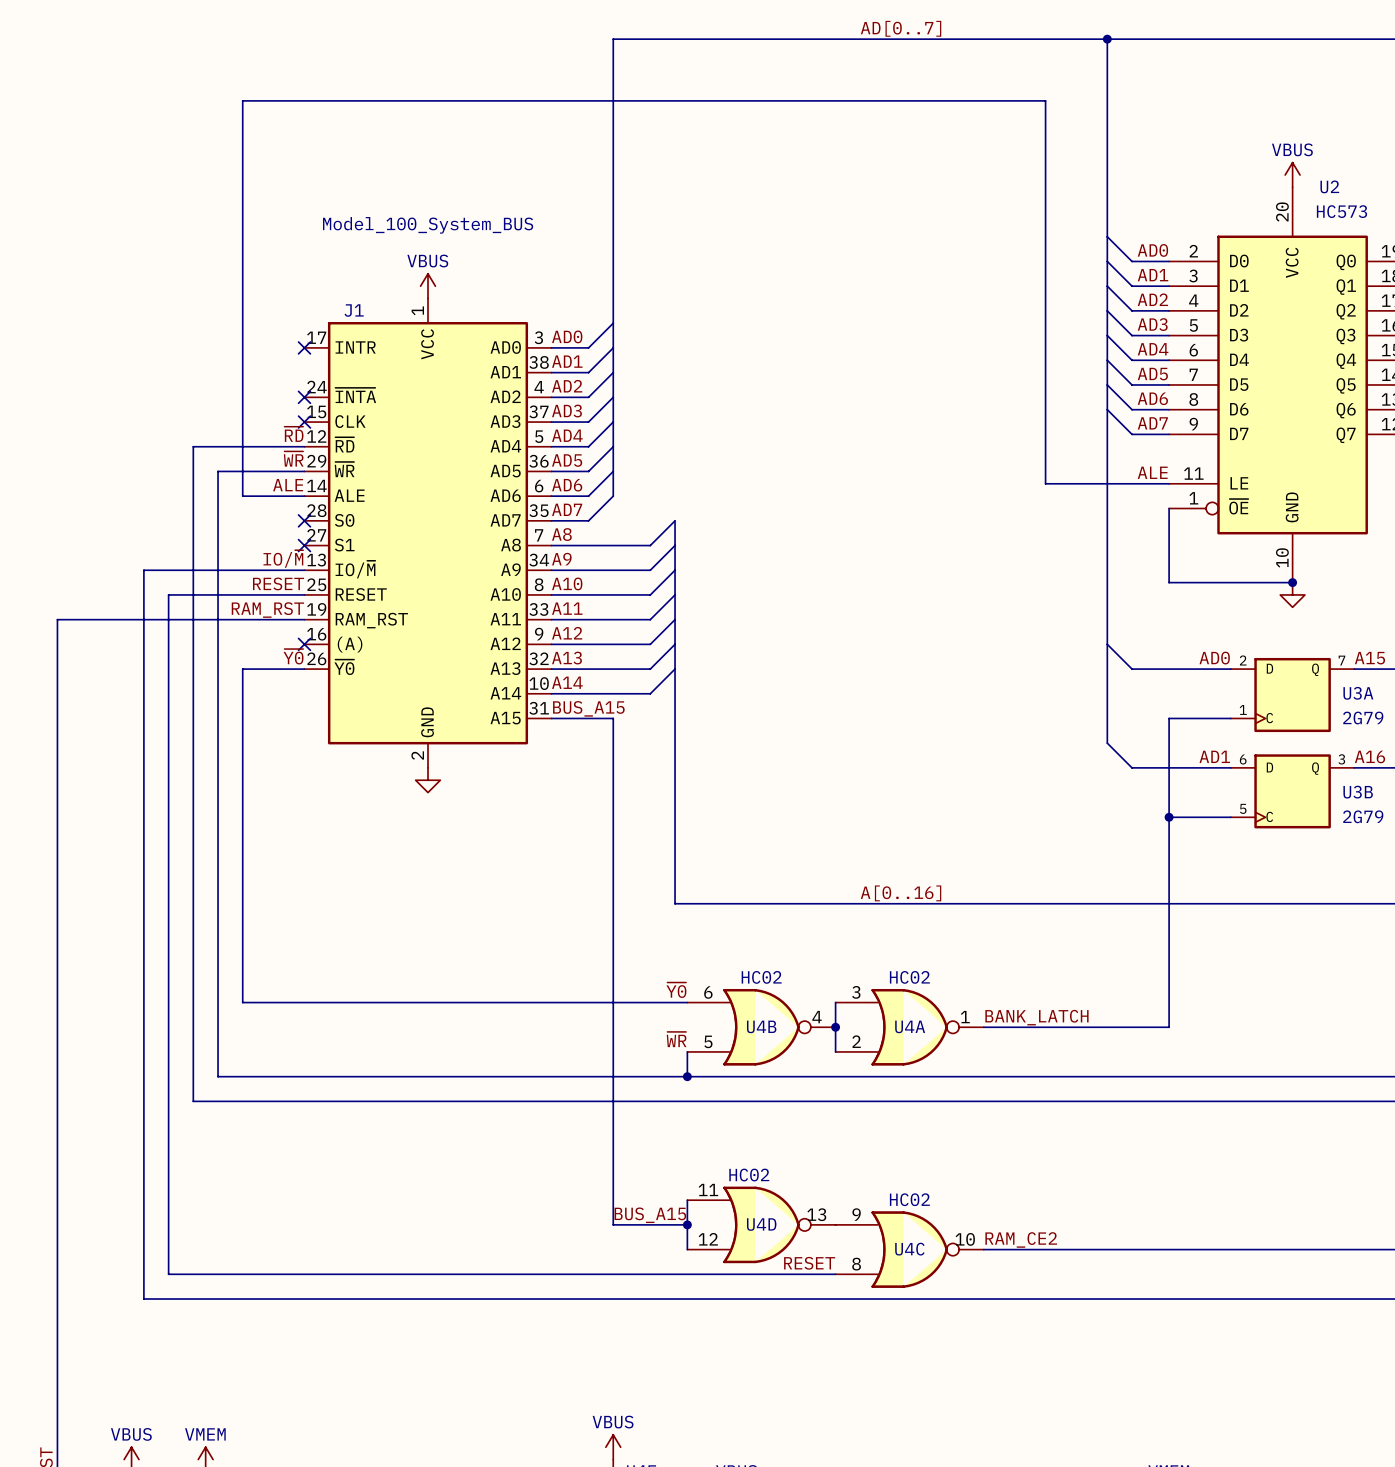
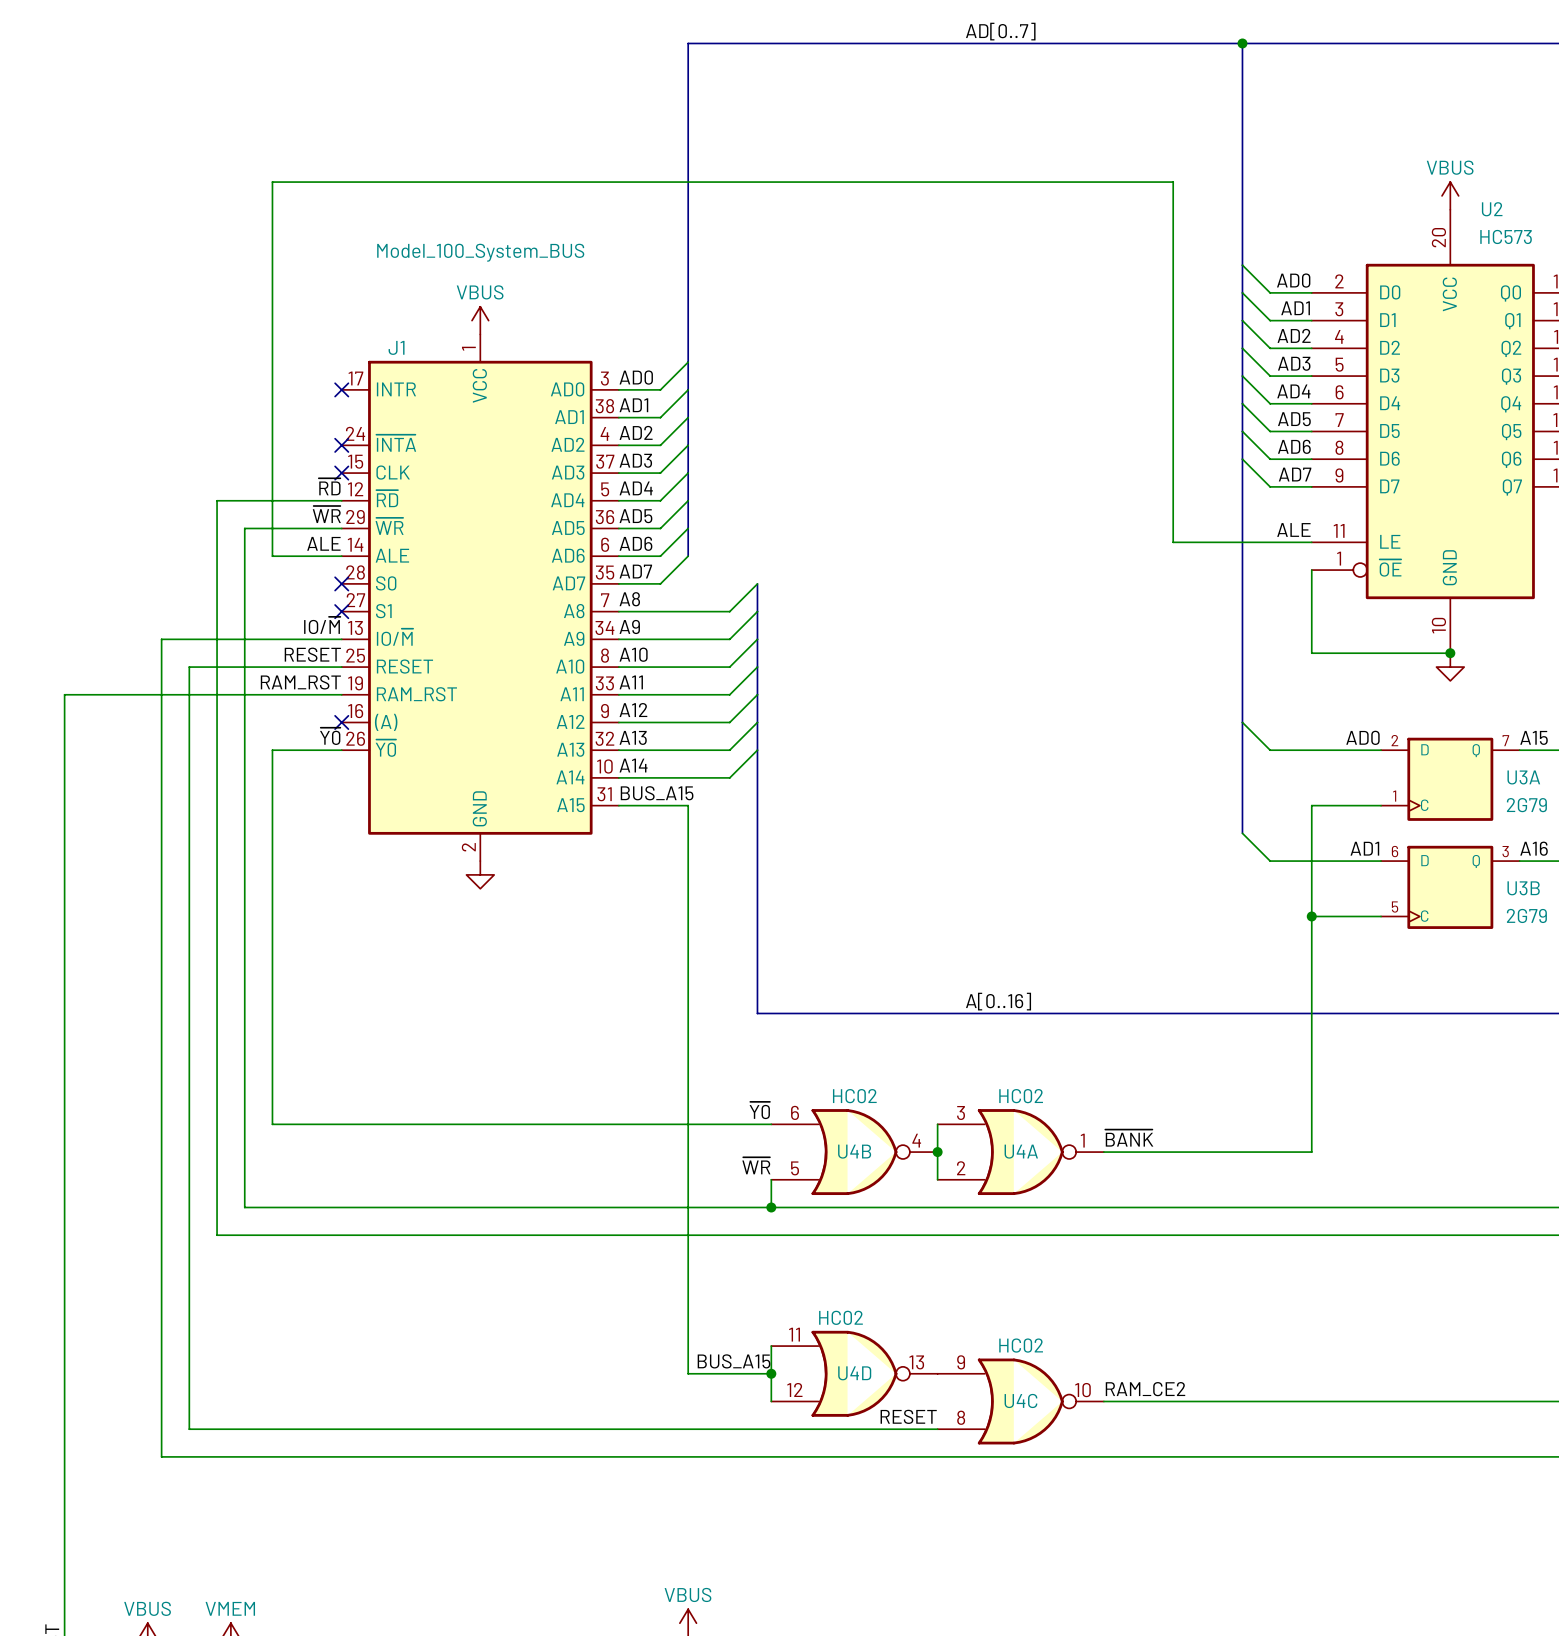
wire: (242, 162) (242, 100) (1045, 100) (1045, 162) -> (272, 182) (1173, 182)
label: BANK_LATCH (1036, 1017) -> ~{BANK} (1129, 1138)

